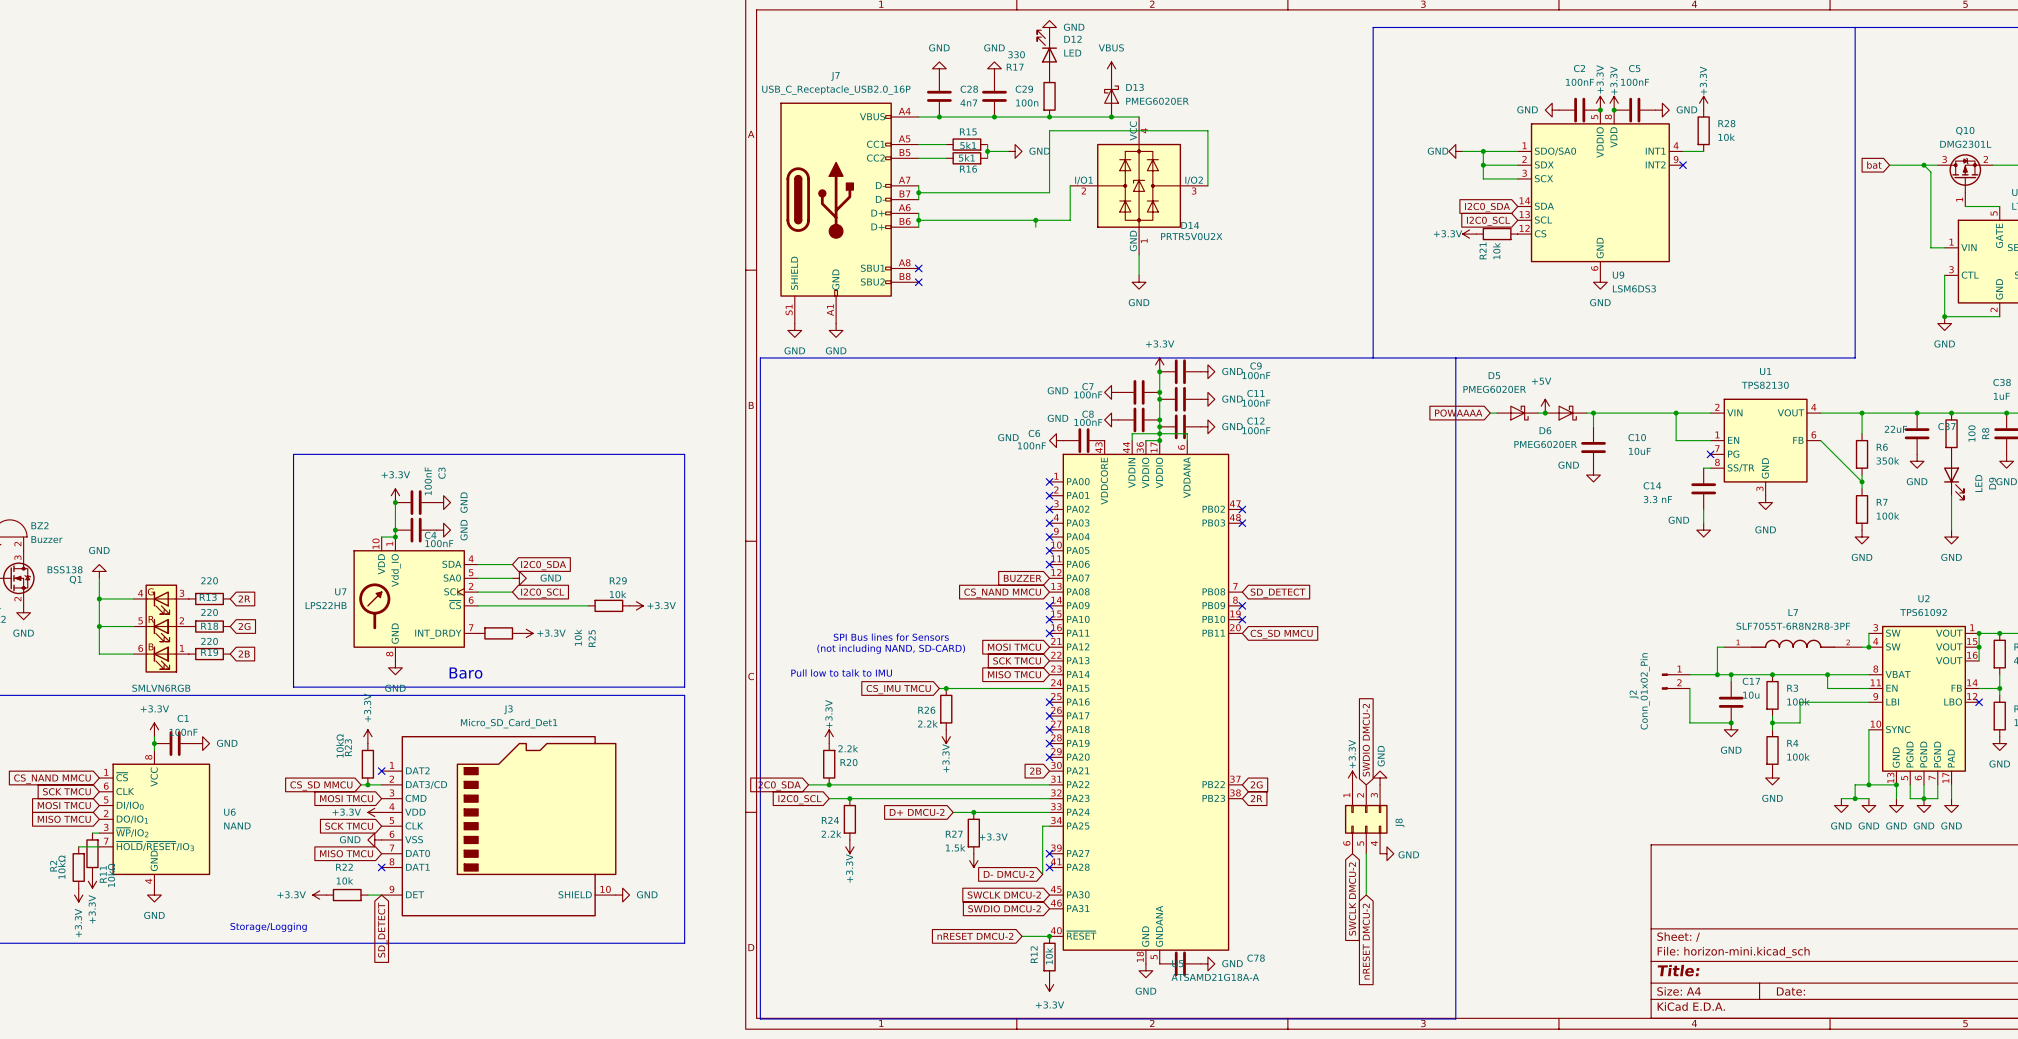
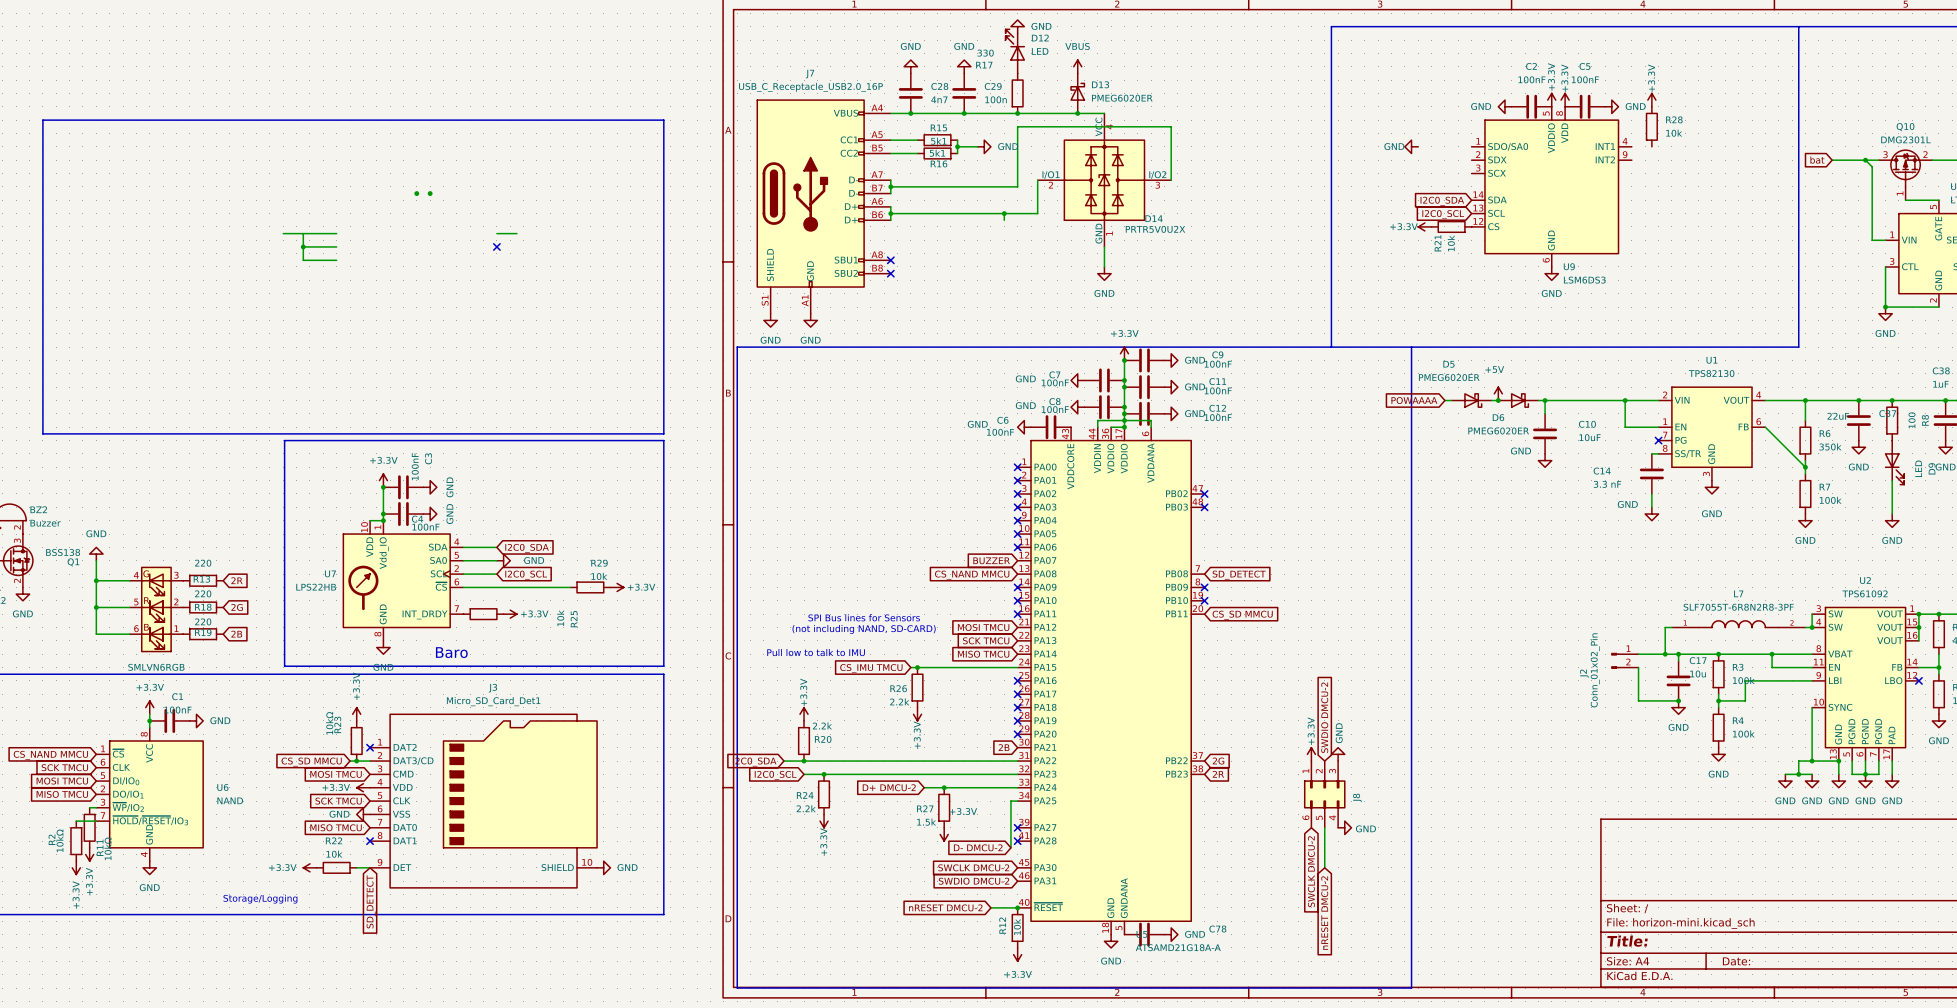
junction: (1600, 110) -> none
junction: (1614, 110) -> none
line: none -> (42, 120) (663, 120) (663, 433) (42, 433) (42, 120)
wire: (1462, 151) (1517, 151) -> none
wire: (1483, 151) (1483, 178) (1517, 178) -> none
junction: (1483, 151) -> none
wire: (1683, 151) (1703, 151) -> none
wire: (1483, 165) (1517, 165) -> none
junction: (1483, 165) -> none
no-connect mark: (1683, 165) -> none
junction: none -> (416, 193)
junction: none -> (430, 193)
wire: none -> (283, 233) (336, 233)
wire: none -> (303, 233) (303, 260) (336, 260)
wire: none -> (496, 233) (516, 233)
wire: none -> (303, 246) (336, 246)
junction: none -> (303, 246)
no-connect mark: none -> (496, 246)

